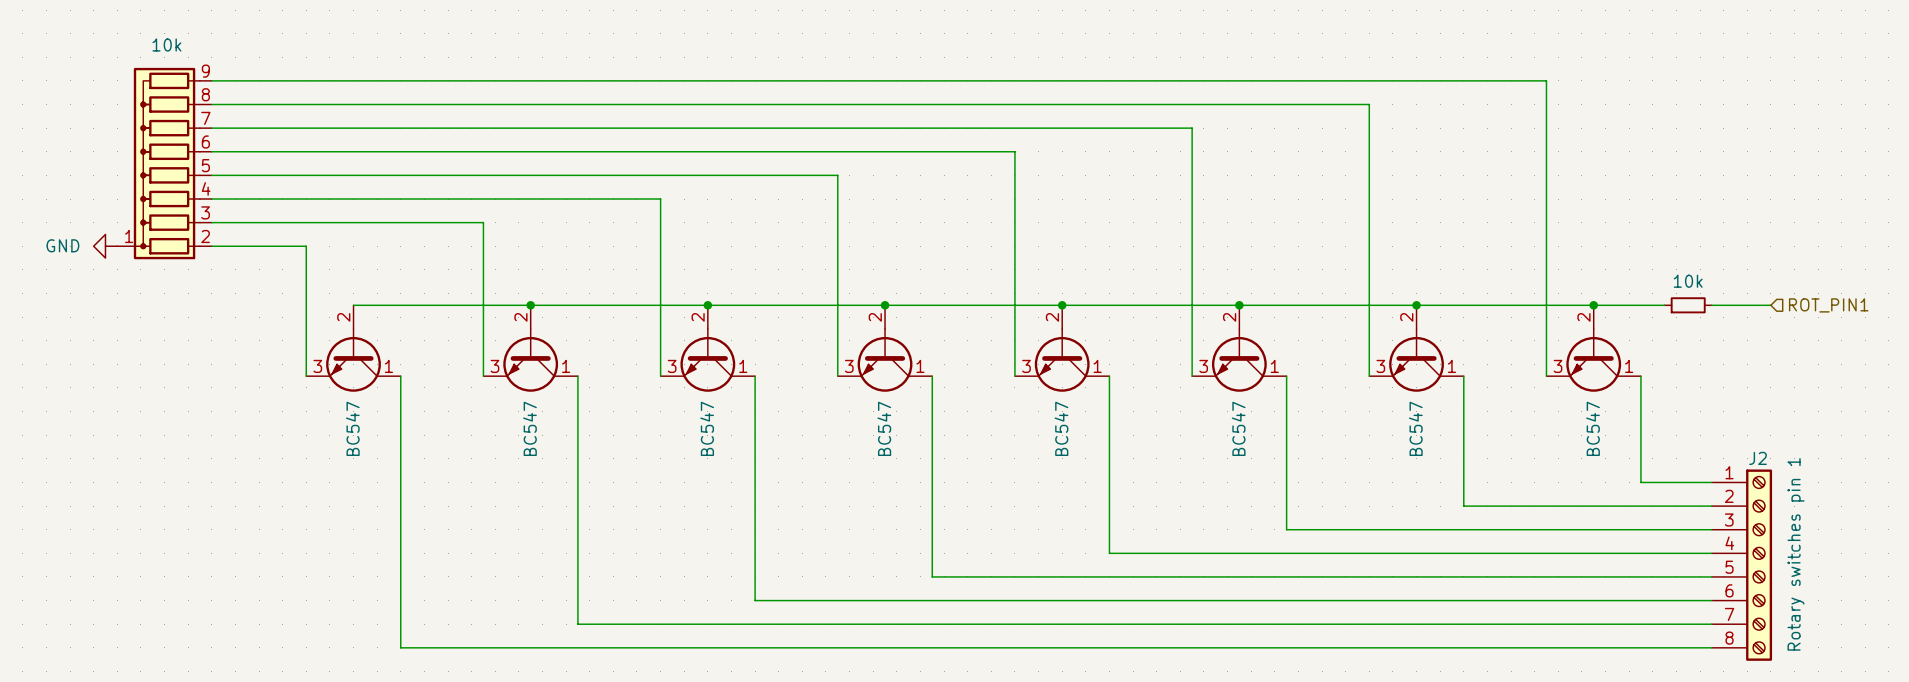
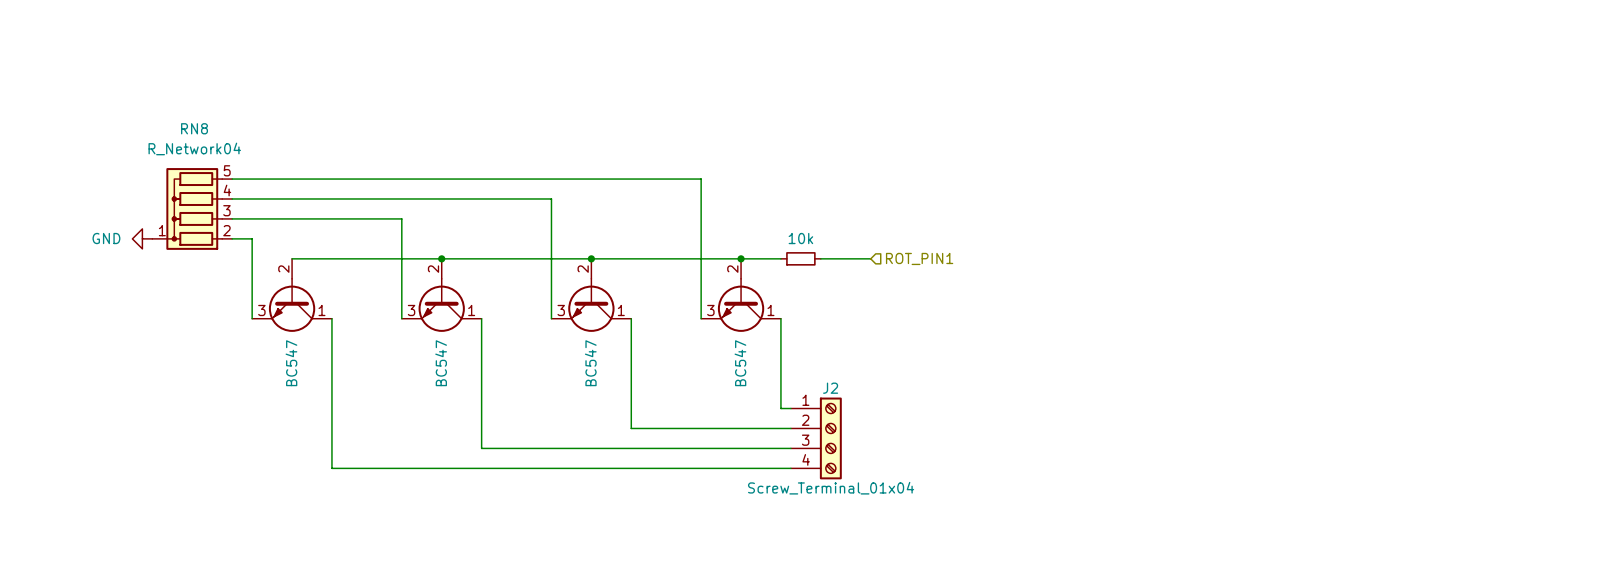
wire: (211, 80) (1546, 80) (1546, 376) -> none
wire: (211, 104) (1369, 104) (1369, 376) -> none
wire: (211, 128) (1192, 128) (1192, 376) -> none
wire: (211, 151) (1014, 151) (1014, 376) -> none
part: 10k (164, 163) -> none
wire: (211, 175) (837, 175) (837, 210) -> (232, 179) (701, 179)
wire: (211, 199) (660, 199) (660, 234) -> (232, 198) (551, 198)
wire: (211, 222) (483, 222) (483, 258) -> (232, 218) (401, 218)
power symbol position: GND (105, 246) -> GND (142, 238)
wire: (211, 246) (306, 246) (306, 281) -> (232, 238) (252, 238)
RN8: none -> R_Network04 (192, 208)
wire: (932, 305) (979, 305) -> none
part: none -> 10k (800, 258)
wire: (1038, 305) (1664, 305) -> none
junction: (1062, 305) -> none
hierarchical label: none -> ROT_PIN1 (919, 258)
junction: (1239, 305) -> none
junction: (1416, 305) -> none
junction: (1593, 305) -> none
part: 10k (1688, 305) -> none
wire: (1711, 305) (1770, 305) -> none
hierarchical label: ROT_PIN1 (1828, 305) -> none
part: BC547 (1062, 348) -> none
part: BC547 (1239, 348) -> none
part: BC547 (1416, 348) -> none
part: BC547 (1593, 348) -> none
wire: (1109, 376) (1109, 553) (1711, 553) -> none
wire: (1286, 376) (1286, 529) (1711, 529) -> none
wire: (1463, 376) (1463, 506) (1711, 506) -> none
wire: (1640, 376) (1640, 482) (1711, 482) -> none
J2 name position: J2 (1758, 458) -> J2 (830, 388)
J2 symbol: [1711, 469, 1773, 661] -> [790, 397, 842, 480]
wire: (932, 482) (932, 576) (1711, 576) -> (780, 408) (790, 408)
wire: (755, 506) (755, 600) (1711, 600) -> (631, 428) (790, 428)
wire: (577, 529) (577, 624) (1711, 624) -> (481, 448) (790, 448)
wire: (400, 553) (400, 647) (1711, 647) -> (331, 468) (790, 468)
J2 value: Rotary switches pin 1 (1796, 554) -> Screw_Terminal_01x04 (831, 488)

